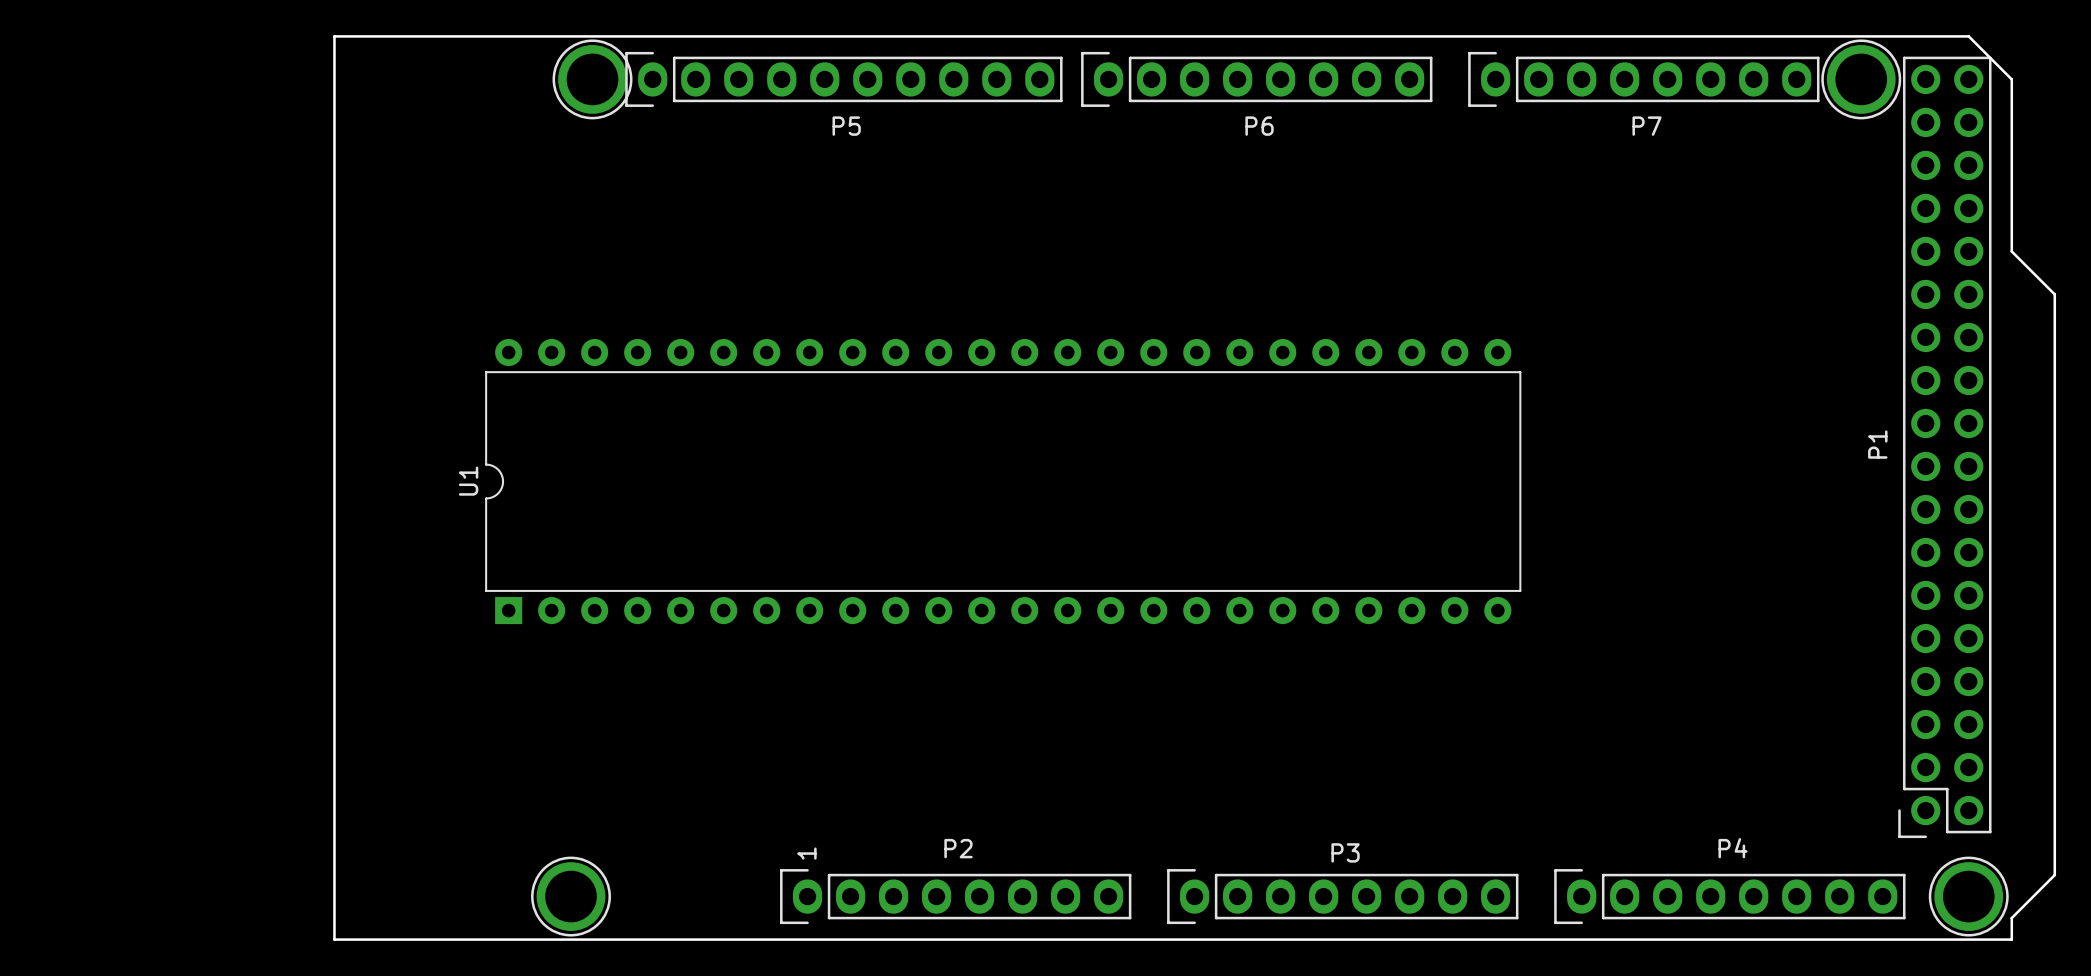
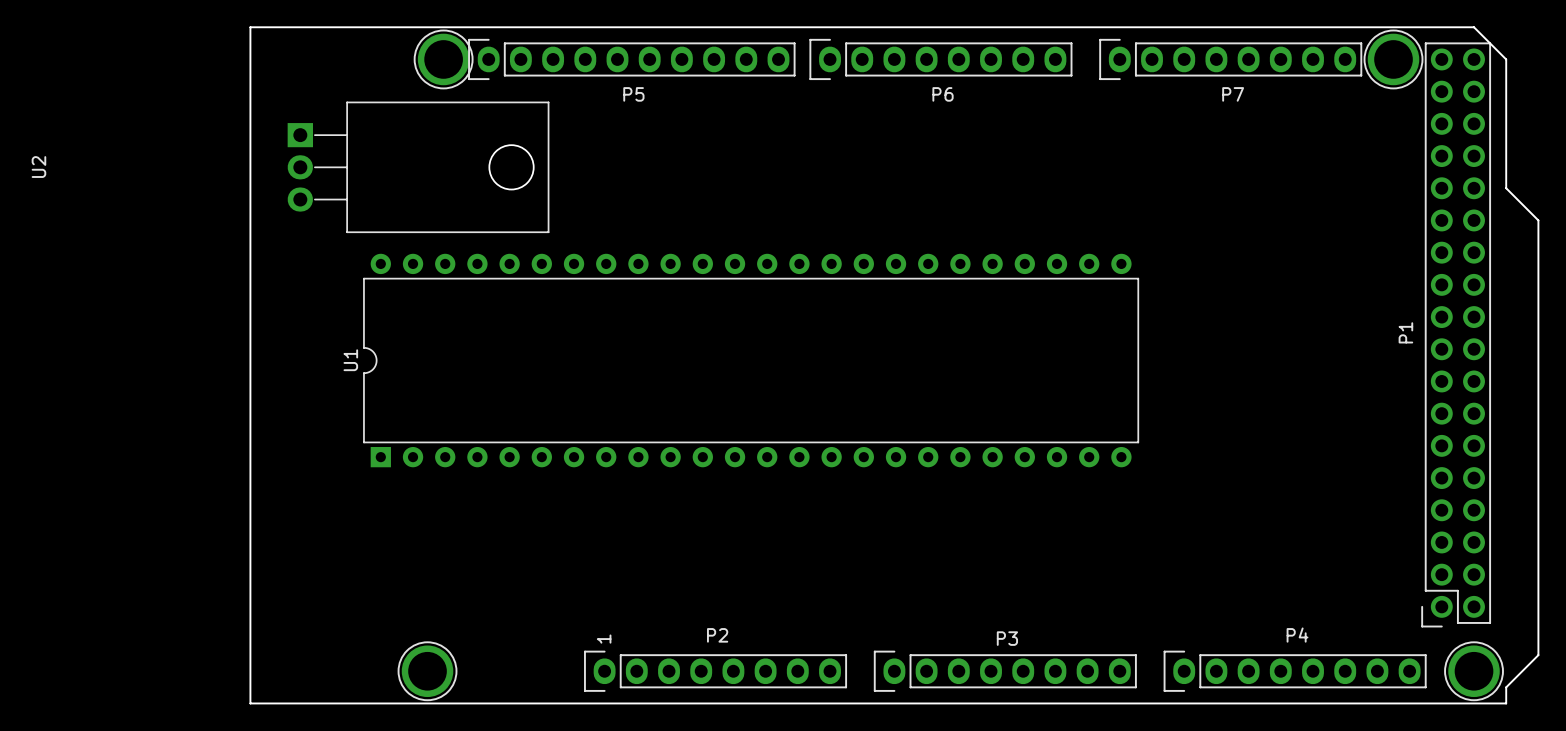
U2: none -> (418, 167)

